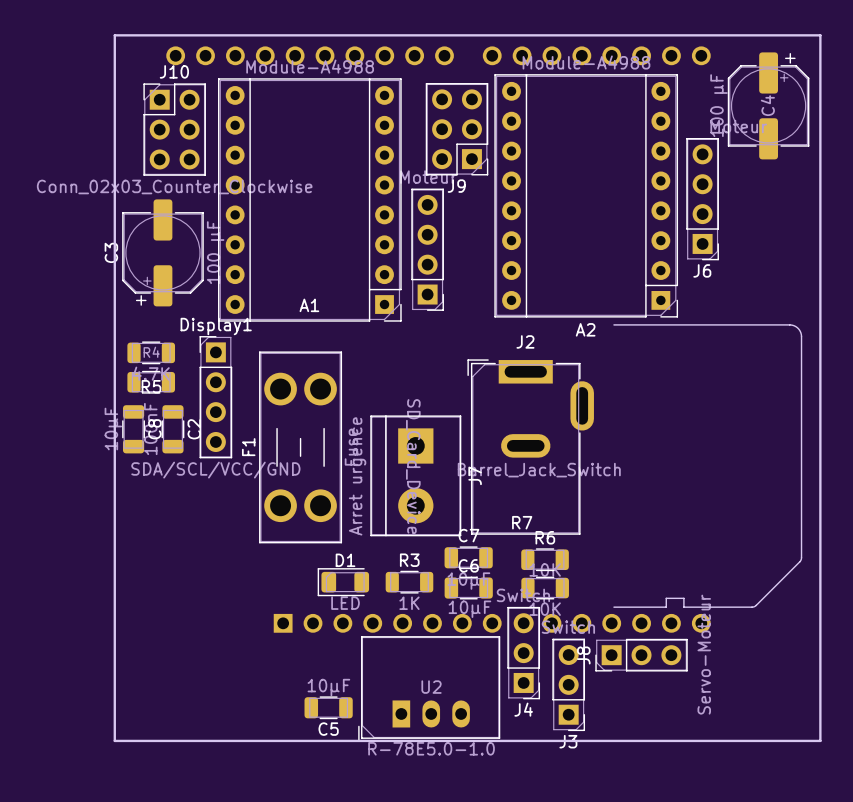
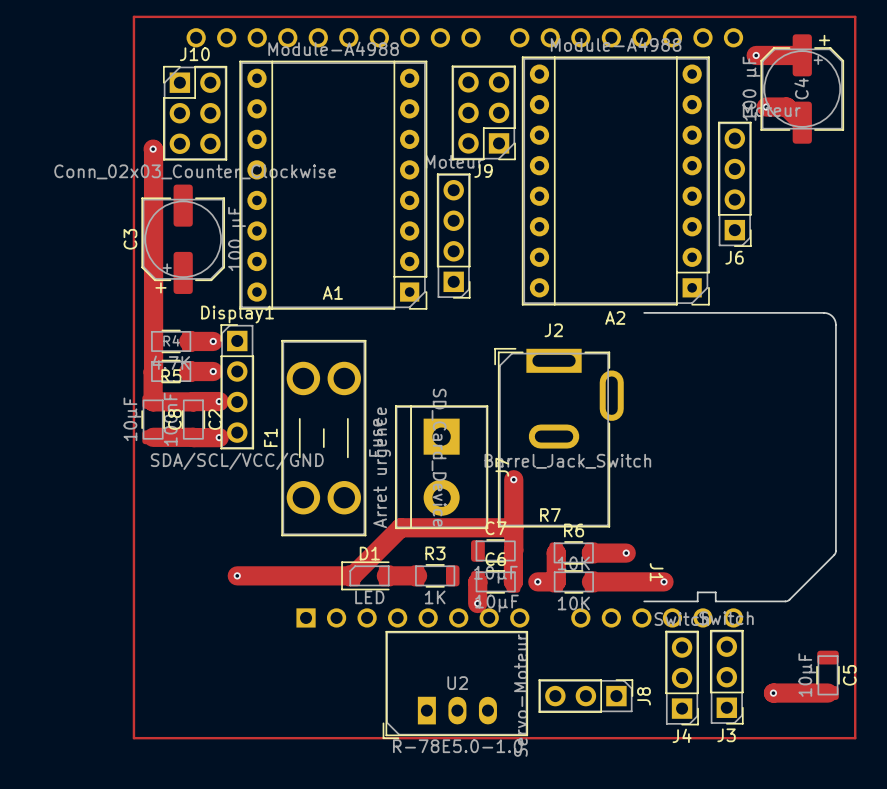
board edge: (114, 35) (820, 35) (820, 740) (114, 740) (114, 35) -> none
track: none -> (133, 16) (855, 16) (855, 738) (133, 738) (133, 16)
track: none -> (756, 55) (802, 55)
via: none -> (756, 55)
track: none -> (766, 107) (786, 107) (802, 122)
via: none -> (766, 107)
track: none -> (153, 149) (153, 401) (219, 401)
via: none -> (153, 149)
track: none -> (188, 341) (213, 341)
via: none -> (213, 341)
track: none -> (188, 371) (213, 371)
via: none -> (213, 371)
via: none -> (219, 401)
track: none -> (153, 437) (219, 437)
via: none -> (219, 437)
track: none -> (513, 479) (513, 581)
via: none -> (513, 479)
track: none -> (513, 527) (400, 527) (352, 575) (237, 575)
track: none -> (556, 553) (556, 581) (537, 581)
track: none -> (591, 552) (626, 553)
via: none -> (626, 553)
J1 name: none -> J1 (656, 572)
via: none -> (237, 575)
track: none -> (386, 575) (417, 575)
track: none -> (478, 581) (477, 603)
via: none -> (537, 581)
track: none -> (591, 581) (664, 581)
via: none -> (664, 581)
via: none -> (477, 603)
J4 position: (523, 653) -> (682, 678)
J8 rotation: 0° (641, 655) -> 180° (585, 696)
J8 position: (641, 655) -> (585, 696)
J3 position: (568, 684) -> (726, 677)
C5 value position: 10µF (328, 687) -> 10µF (807, 675)
track: none -> (773, 693) (827, 693)
via: none -> (773, 693)
C5 rotation: 0° (328, 707) -> 90° clockwise (827, 675)
C5 position: (328, 707) -> (827, 675)
C5 name position: C5 (328, 729) -> C5 (849, 675)

